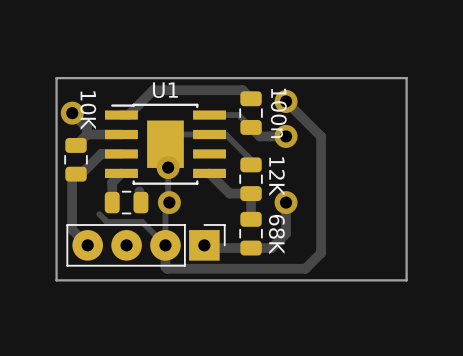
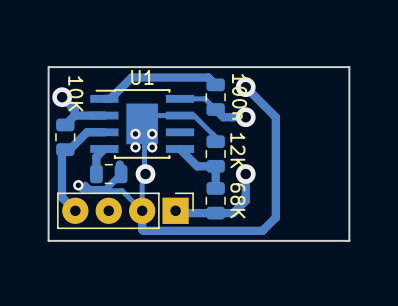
via: none -> (135, 133)
via: none -> (152, 133)
via: (168, 167) -> none
via: none -> (135, 147)
via: none -> (152, 147)
track: none -> (121, 174) (105, 189) (82, 189) (78, 185)
via: none -> (78, 185)

